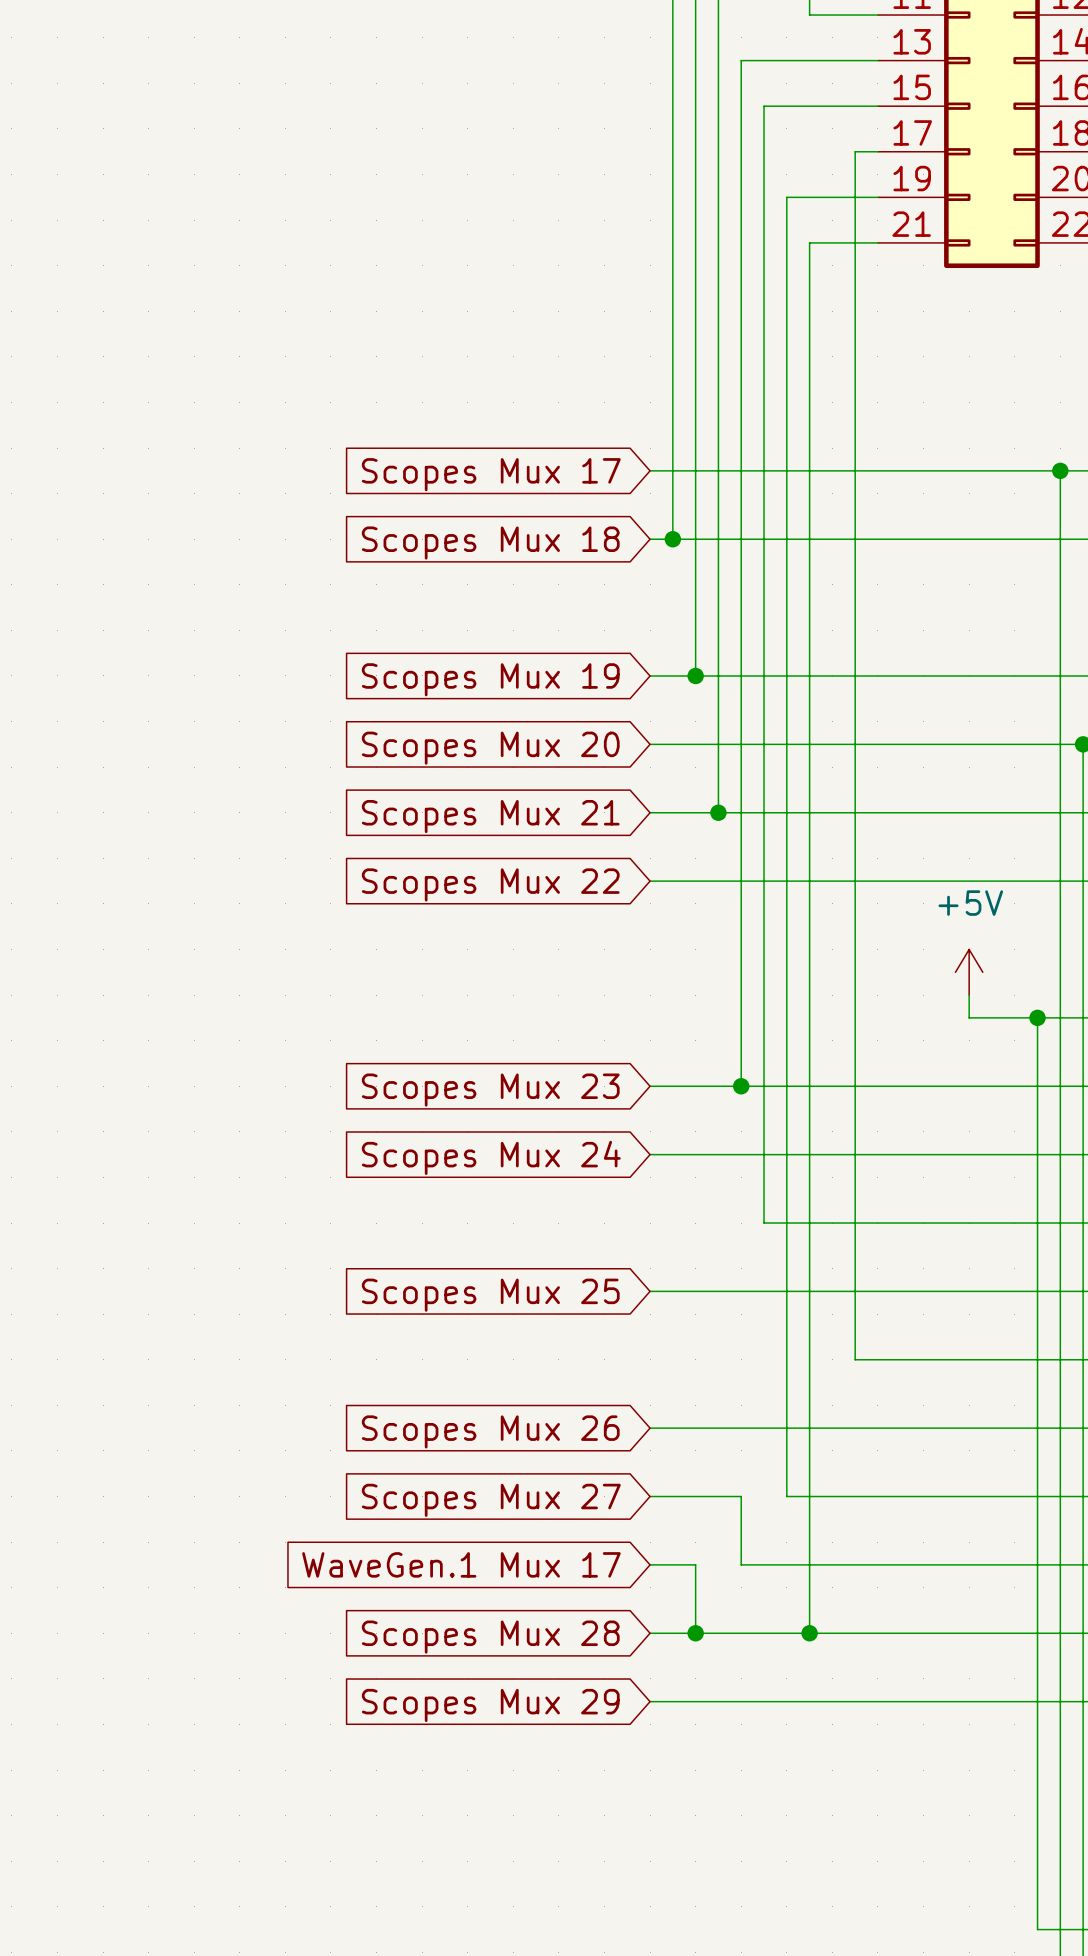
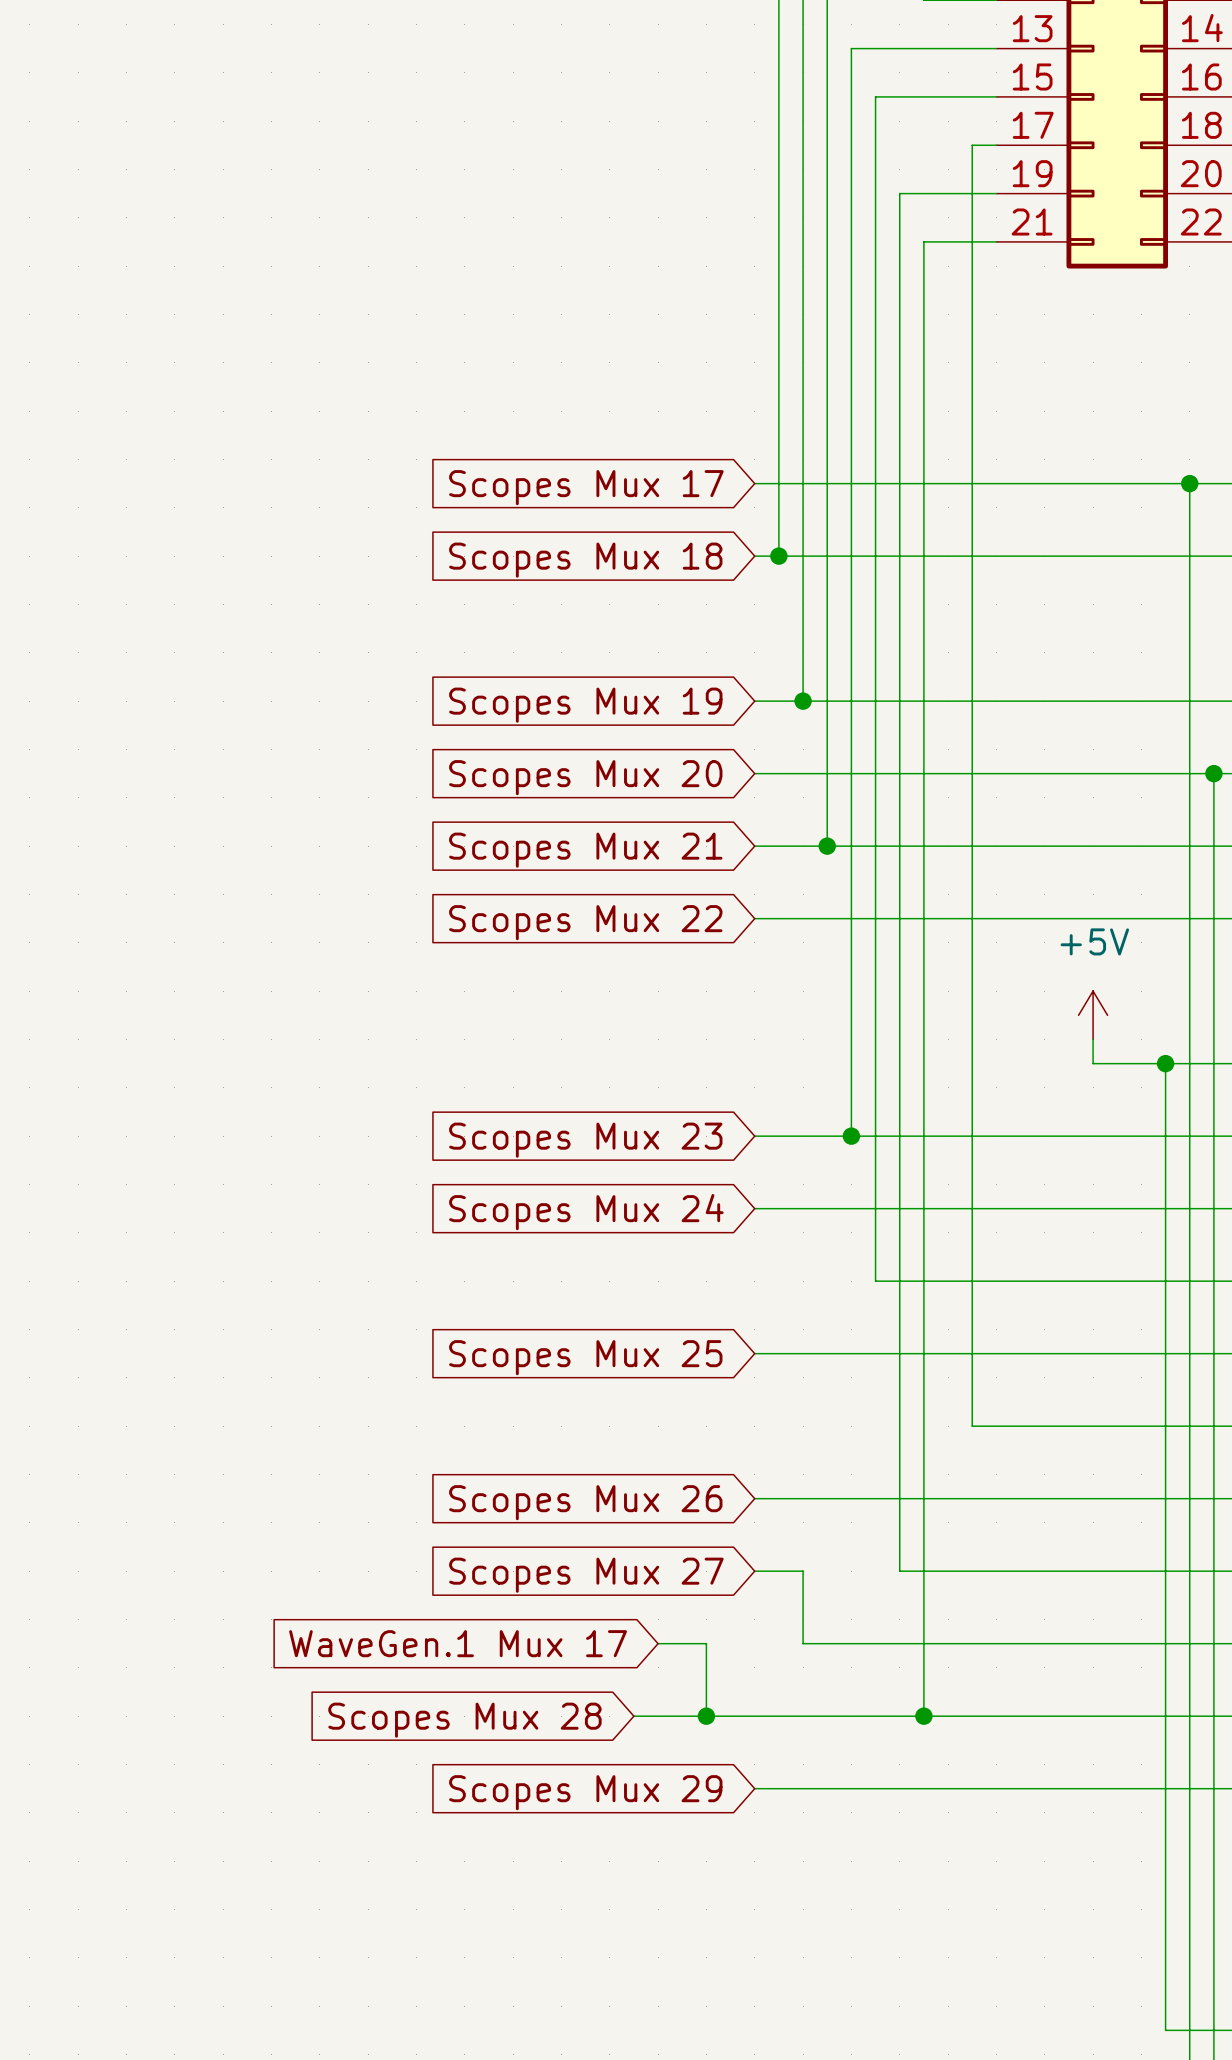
wire: (695, 1496) (741, 1496) (741, 1564) -> (803, 1571) (803, 1643) (851, 1643)
global label position: WaveGen.1 Mux 17 (461, 1564) -> WaveGen.1 Mux 17 (458, 1643)
wire: (650, 1564) (695, 1564) (695, 1633) -> (658, 1643) (706, 1643) (706, 1716)
wire: none -> (633, 1716) (754, 1716)
junction position: (695, 1633) -> (706, 1716)
global label position: Scopes Mux 28 (490, 1637) -> Scopes Mux 28 (464, 1720)

